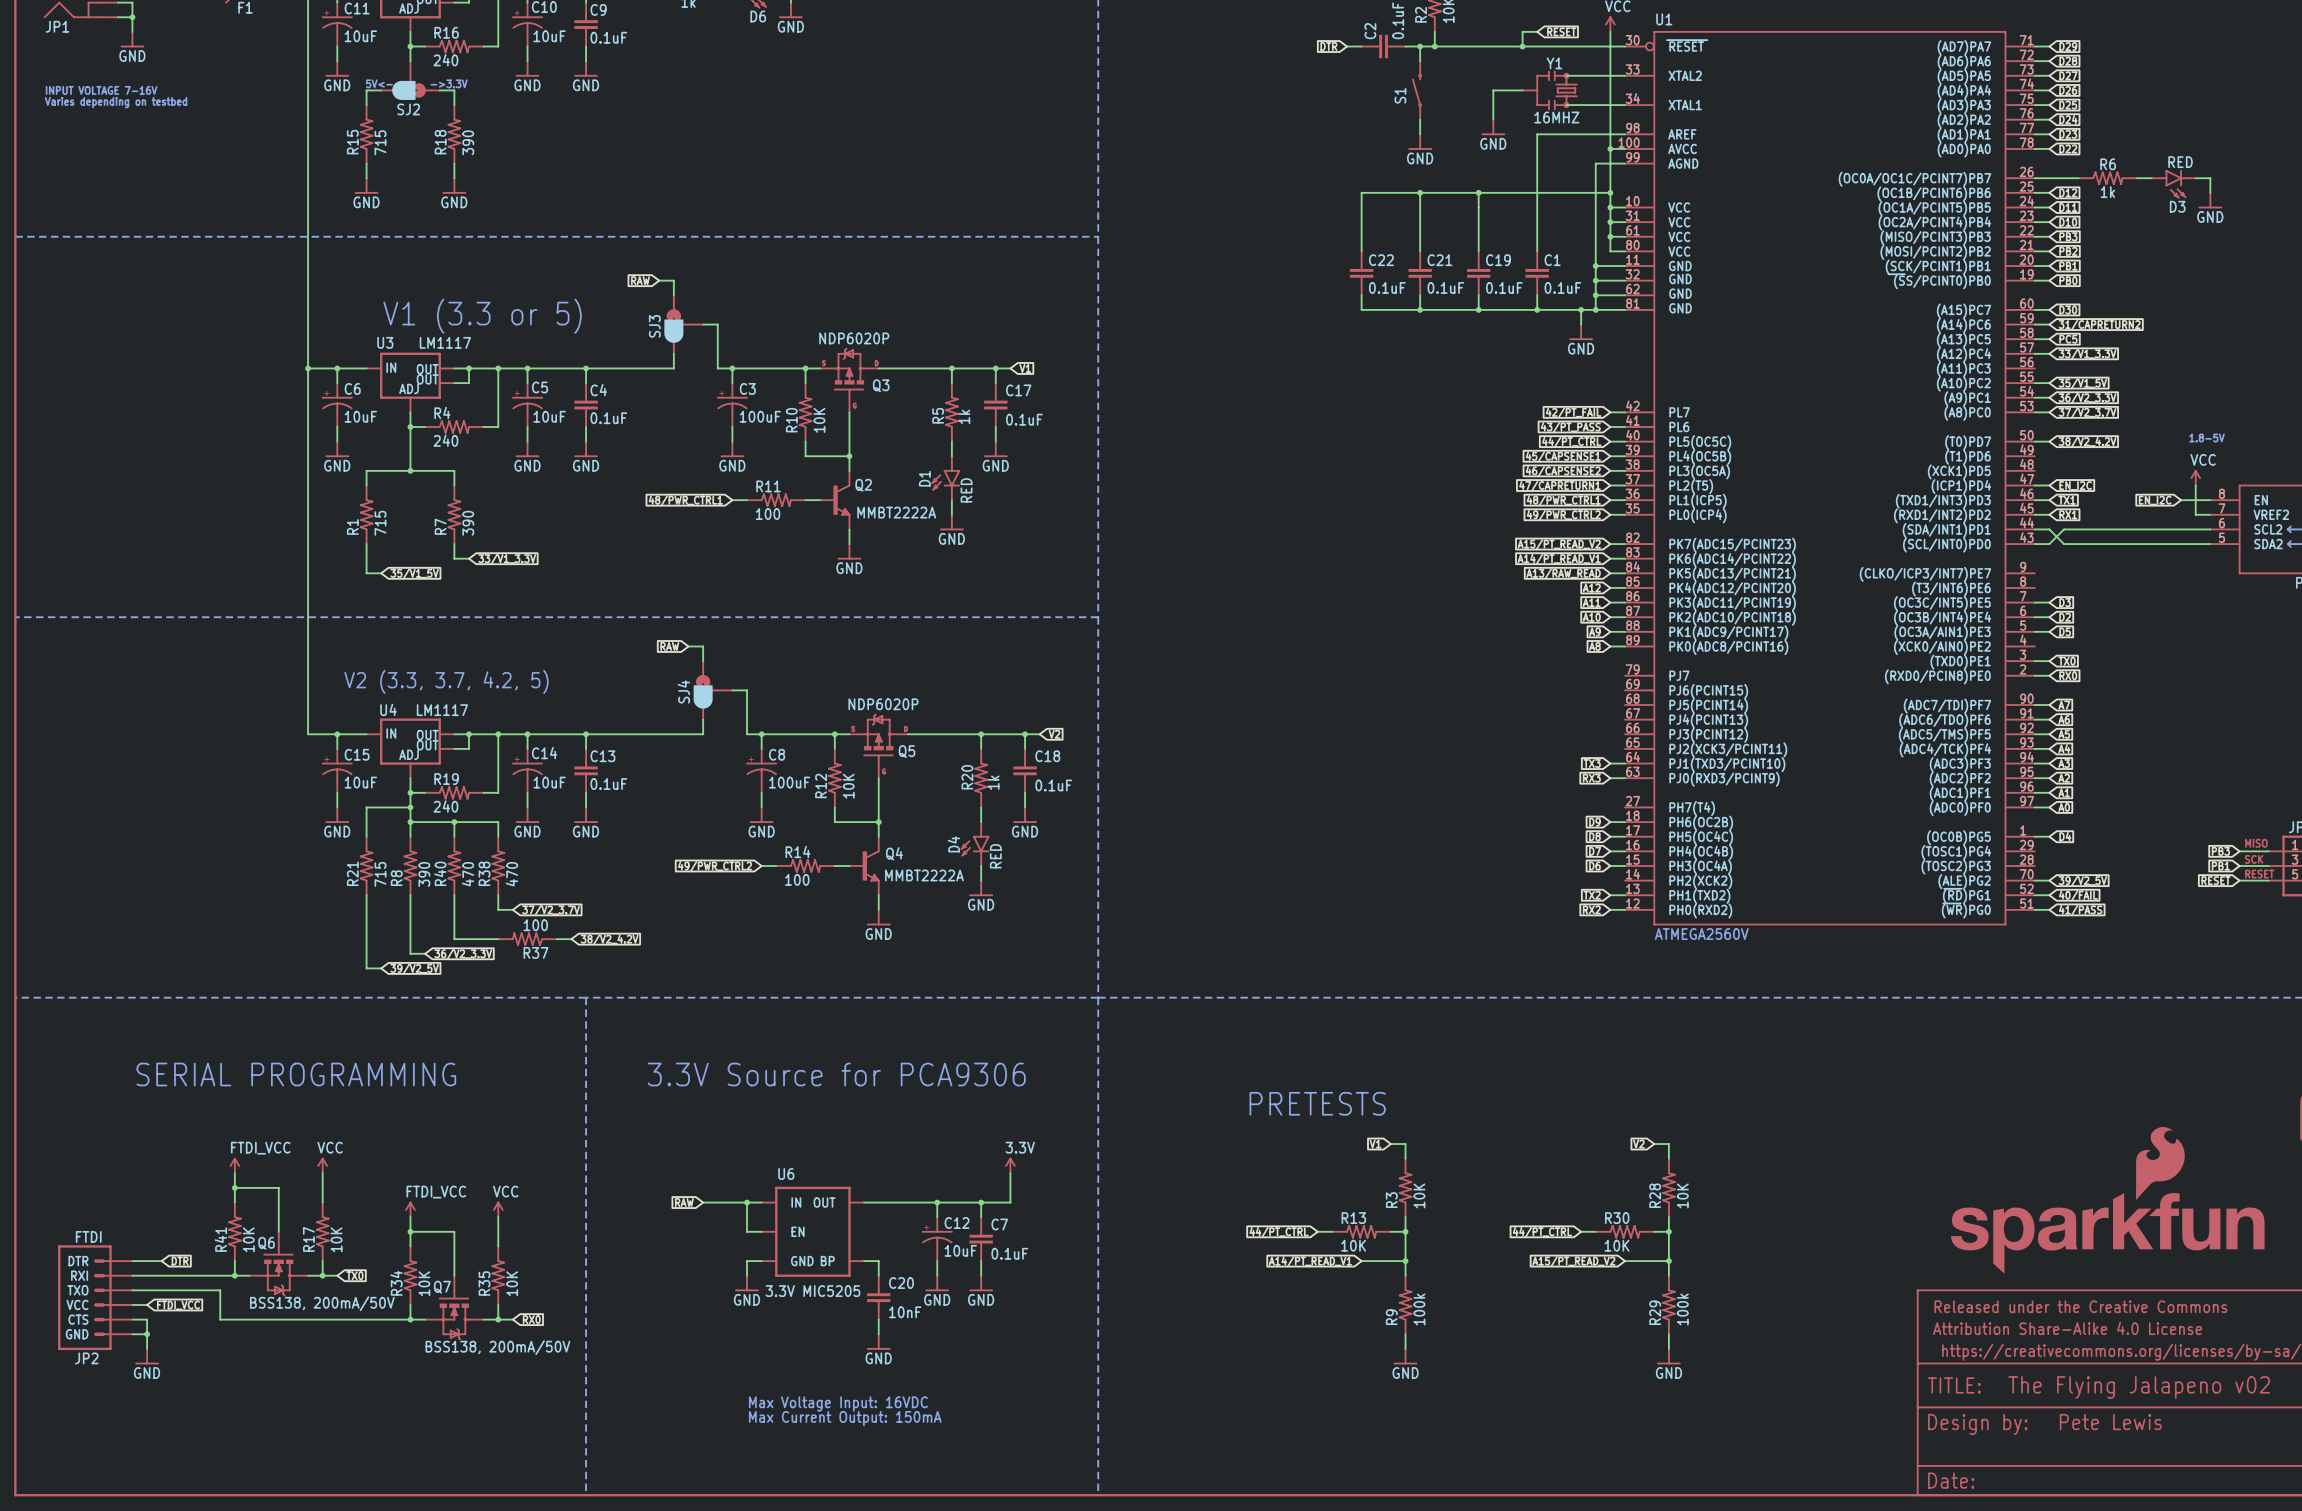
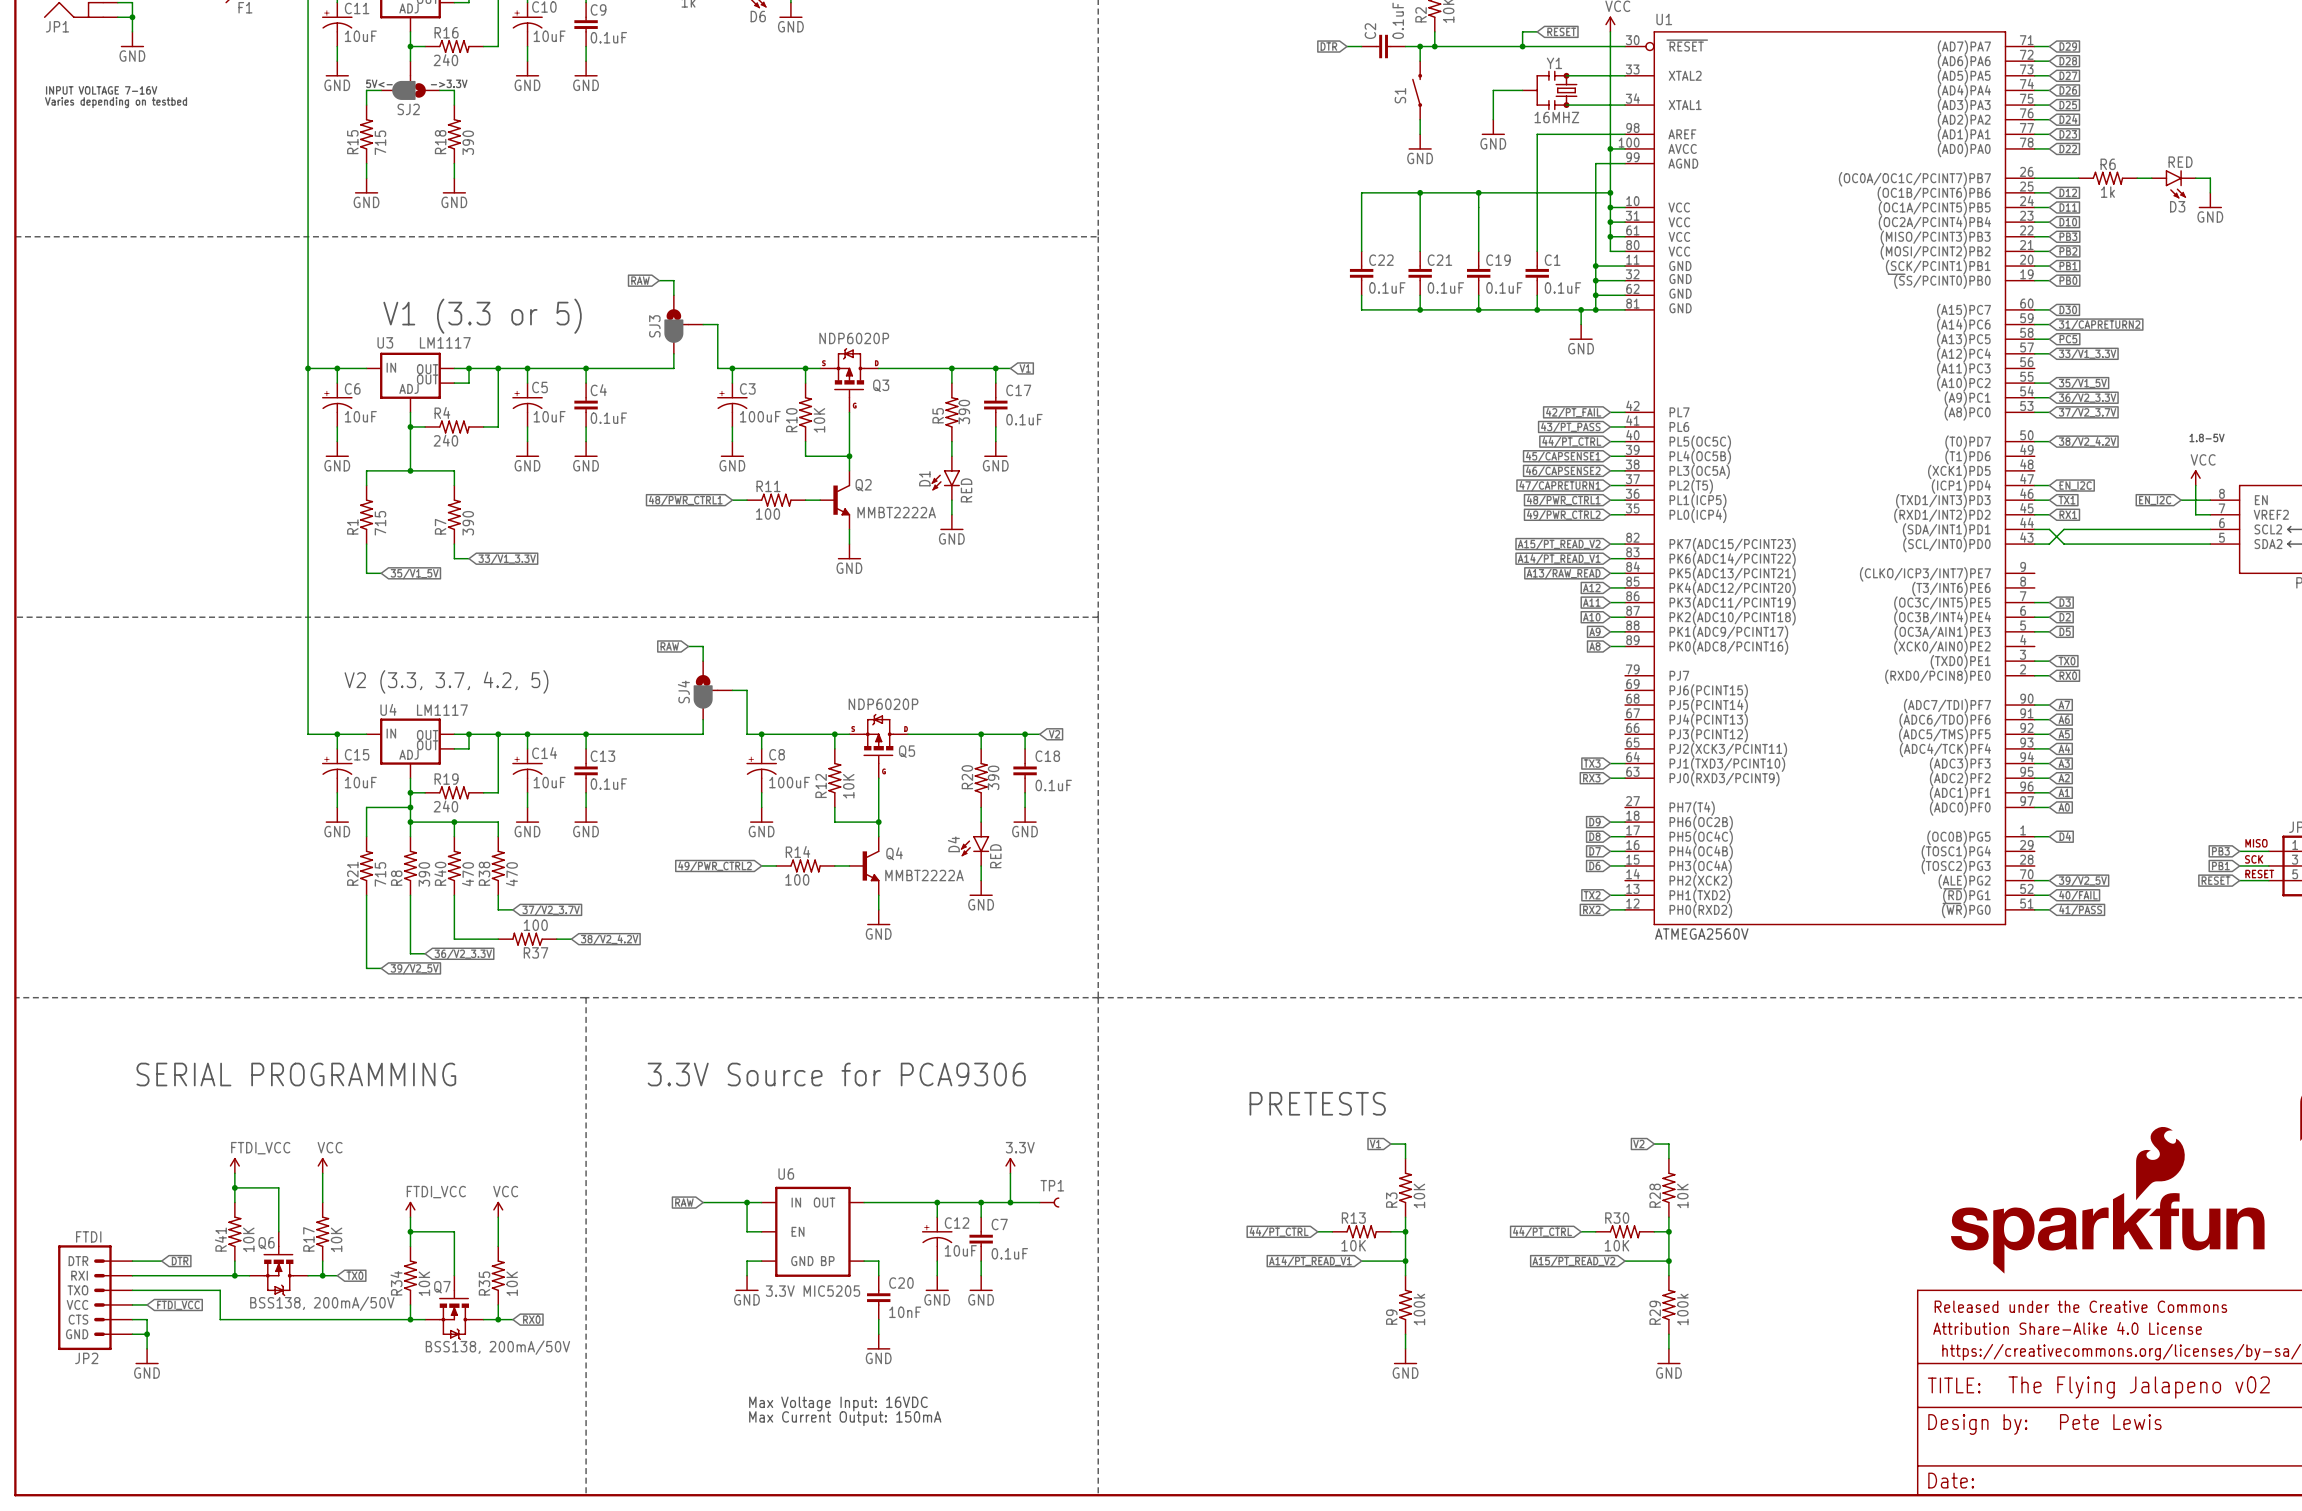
R5 value: 1k (964, 416) -> 390 (964, 412)
R20 value: 1k (993, 782) -> 390 (993, 777)
wire: none -> (1010, 1202) (1039, 1202)
junction: none -> (1010, 1202)
TP1: none -> (1049, 1202)

